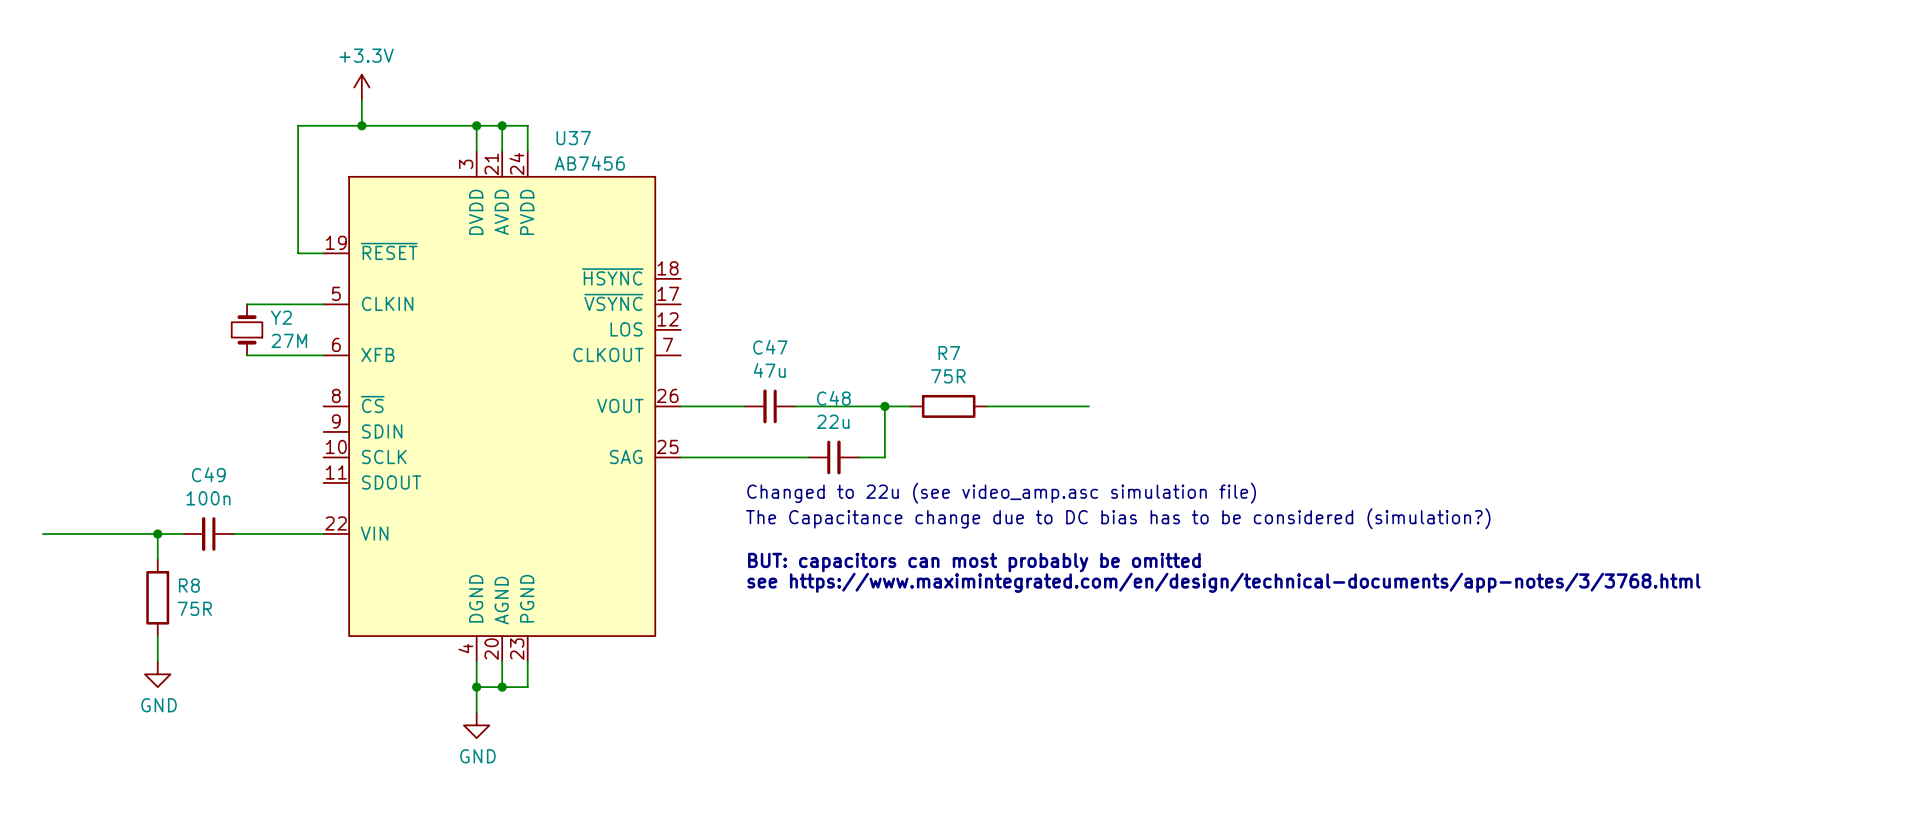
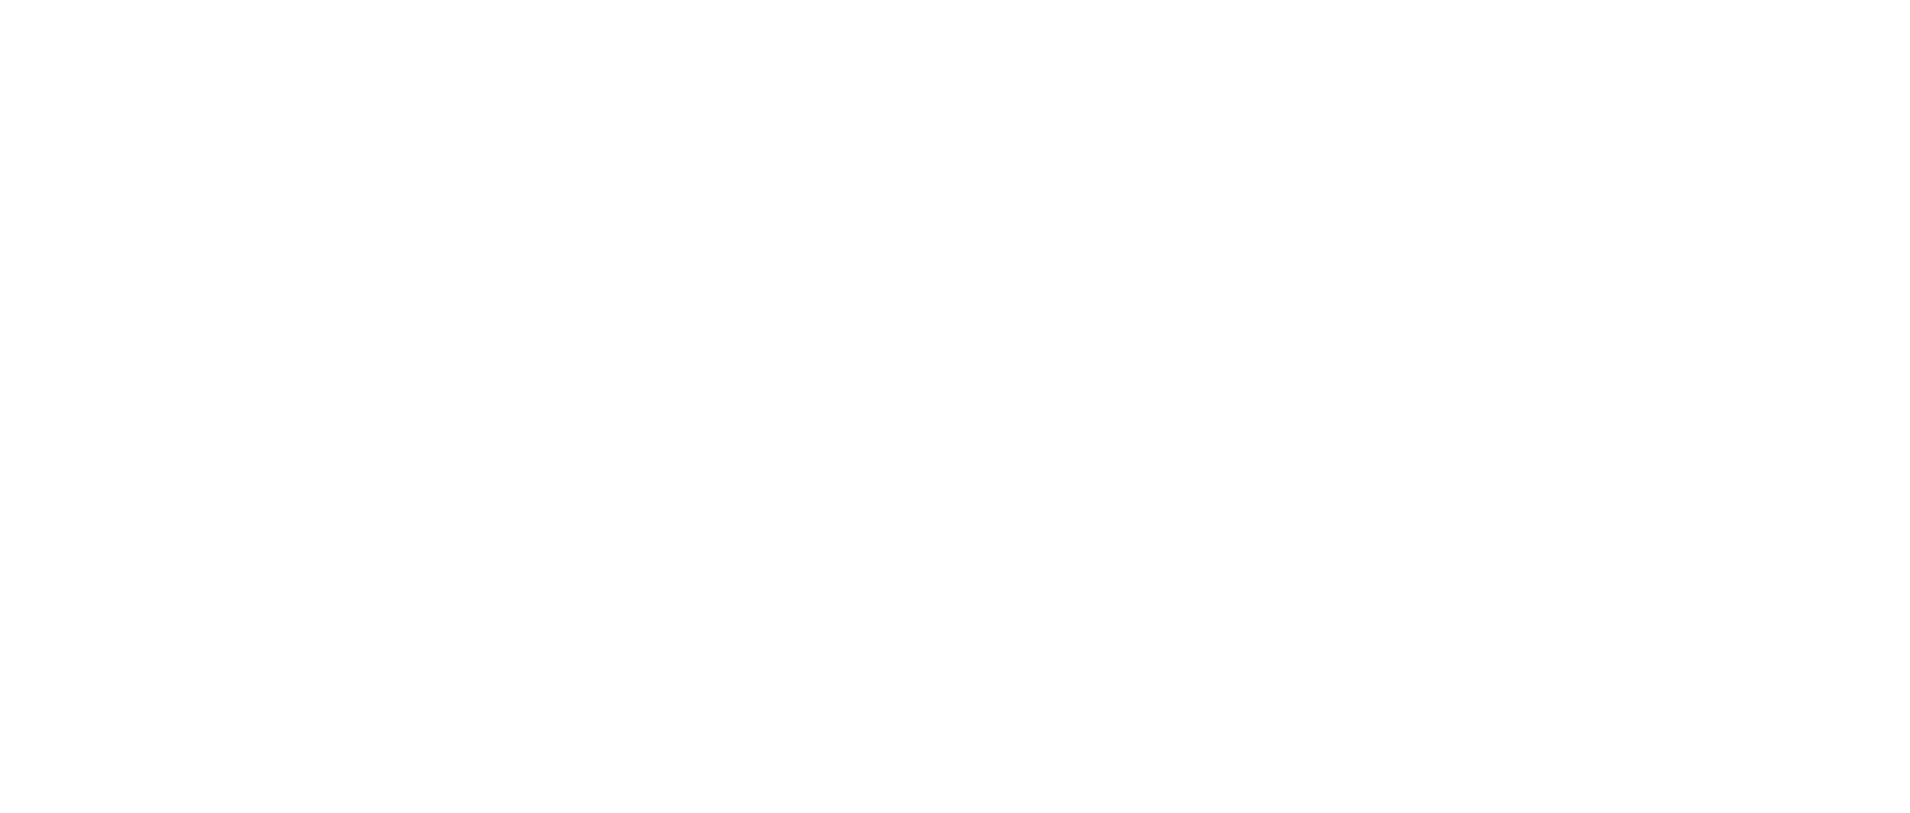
power symbol: +3.3V (361, 87) -> none
wire: (361, 100) (361, 125) -> none
junction: (361, 125) -> none
wire: (476, 125) (476, 151) -> none
junction: (476, 125) -> none
wire: (502, 125) (502, 151) -> none
junction: (502, 125) -> none
wire: (527, 151) (527, 125) (298, 125) (298, 253) (323, 253) -> none
wire: (247, 304) (323, 304) -> none
Y2: 27M (247, 329) -> none
wire: (247, 355) (323, 355) -> none
U37: AB7456 (502, 406) -> none
wire: (680, 406) (744, 406) -> none
C47: 47u (770, 406) -> none
wire: (795, 406) (910, 406) -> none
wire: (884, 406) (884, 457) (859, 457) -> none
junction: (884, 406) -> none
R7: 75R (948, 406) -> none
wire: (986, 406) (1089, 406) -> none
wire: (680, 457) (808, 457) -> none
C48: 22u (833, 457) -> none
text: Changed to 22u (see video_amp.asc simulation file) (1001, 493) -> none
text: The Capacitance change due to DC bias has to be considered (simulation?) (1118, 518) -> none
wire: (42, 534) (183, 534) -> none
wire: (157, 534) (157, 559) -> none
junction: (157, 534) -> none
C49: 100n (208, 534) -> none
wire: (234, 534) (323, 534) -> none
text: BUT: capacitors can most probably be omitted (974, 562) -> none
text: see https://www.maximintegrated.com/en/design/technical-documents/app-notes/3/3768.html (1224, 582) -> none
R8: 75R (157, 597) -> none
wire: (157, 636) (157, 661) -> none
wire: (476, 661) (476, 712) -> none
wire: (502, 661) (502, 687) -> none
wire: (527, 661) (527, 687) (476, 687) -> none
power symbol: GND (157, 674) -> none
junction: (476, 687) -> none
junction: (502, 687) -> none
power symbol: GND (476, 725) -> none

